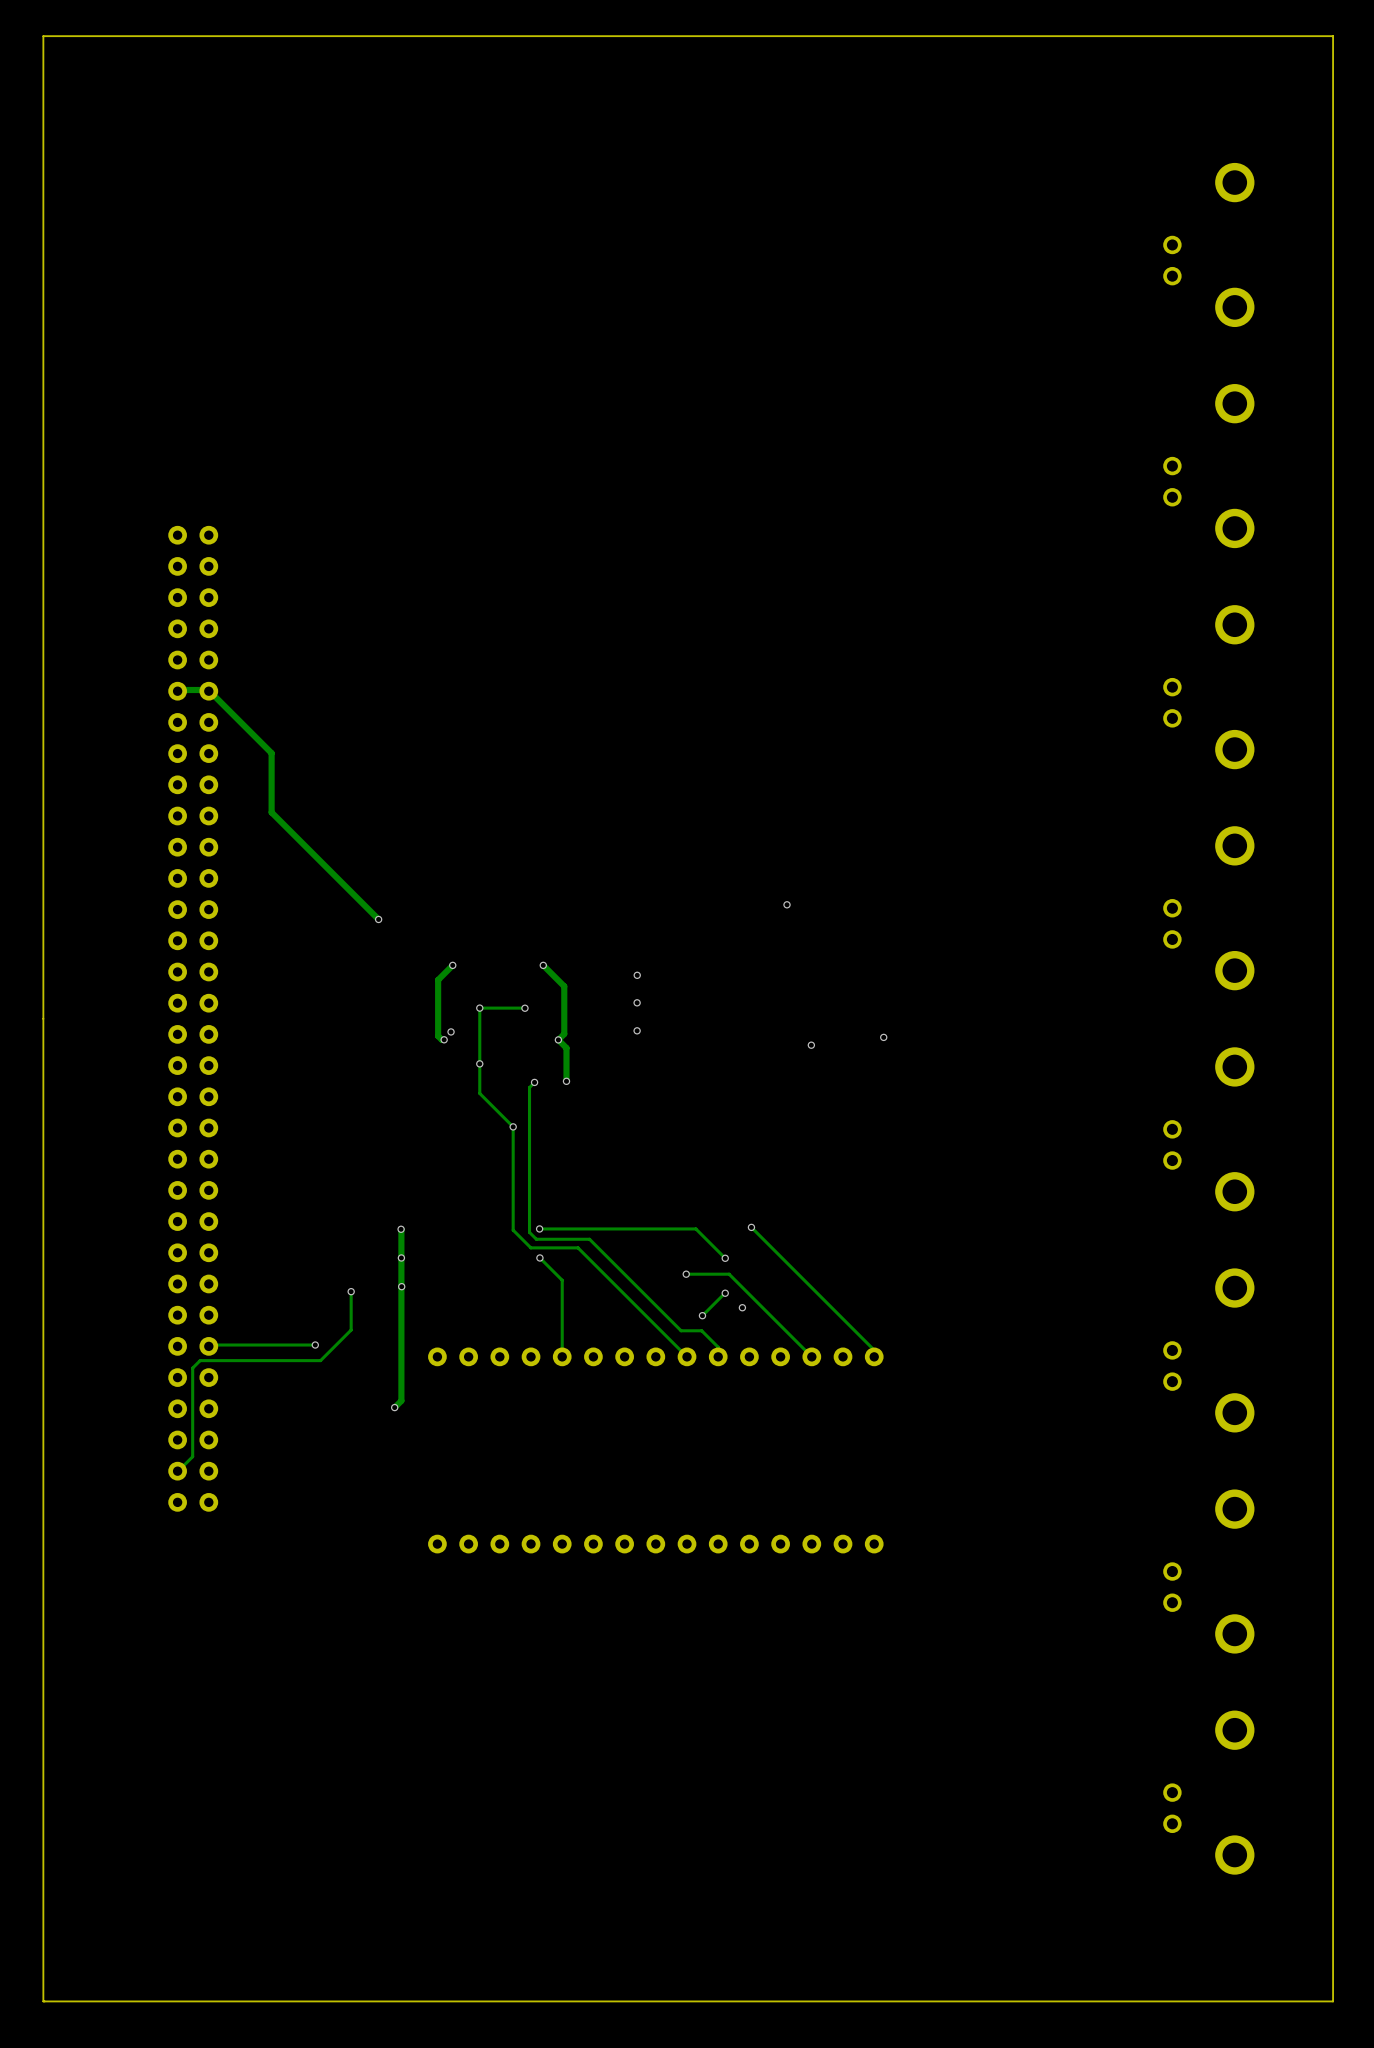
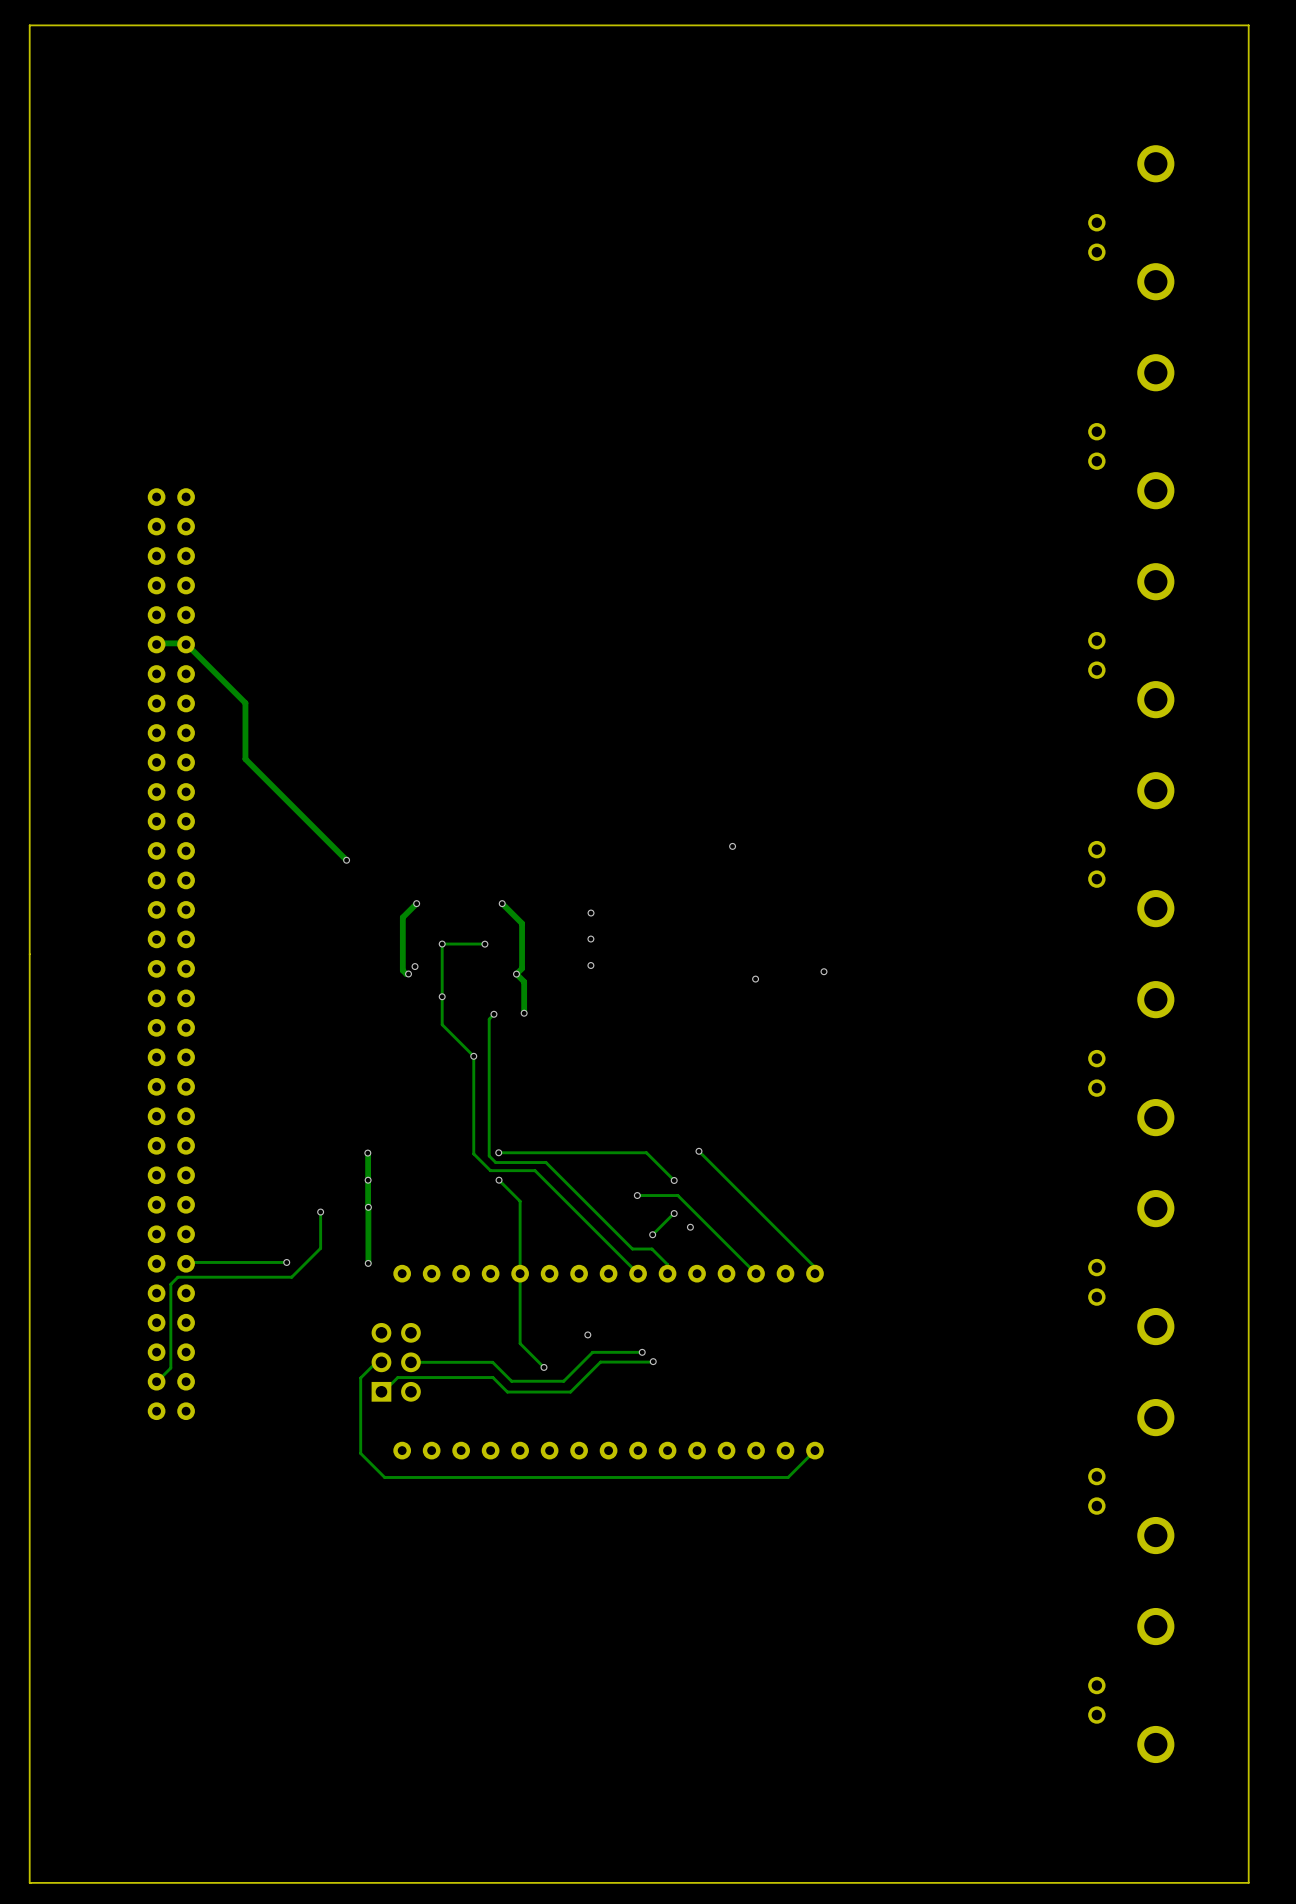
track: (401, 1286) (401, 1400) (394, 1407) -> (368, 1207) (368, 1263)
track: none -> (520, 1273) (520, 1343) (544, 1367)
via position: (394, 1407) -> (368, 1263)
via: none -> (587, 1334)
track: none -> (642, 1352) (592, 1352) (563, 1381) (511, 1381) (492, 1362) (410, 1362)
via: none -> (642, 1352)
track: none -> (653, 1361) (600, 1362) (570, 1392) (507, 1392) (492, 1377) (397, 1377) (381, 1391)
via: none -> (653, 1361)
track: none -> (381, 1362) (376, 1362) (360, 1377) (360, 1453) (384, 1477) (788, 1477) (815, 1450)
part: none -> (396, 1362)
via: none -> (544, 1367)

